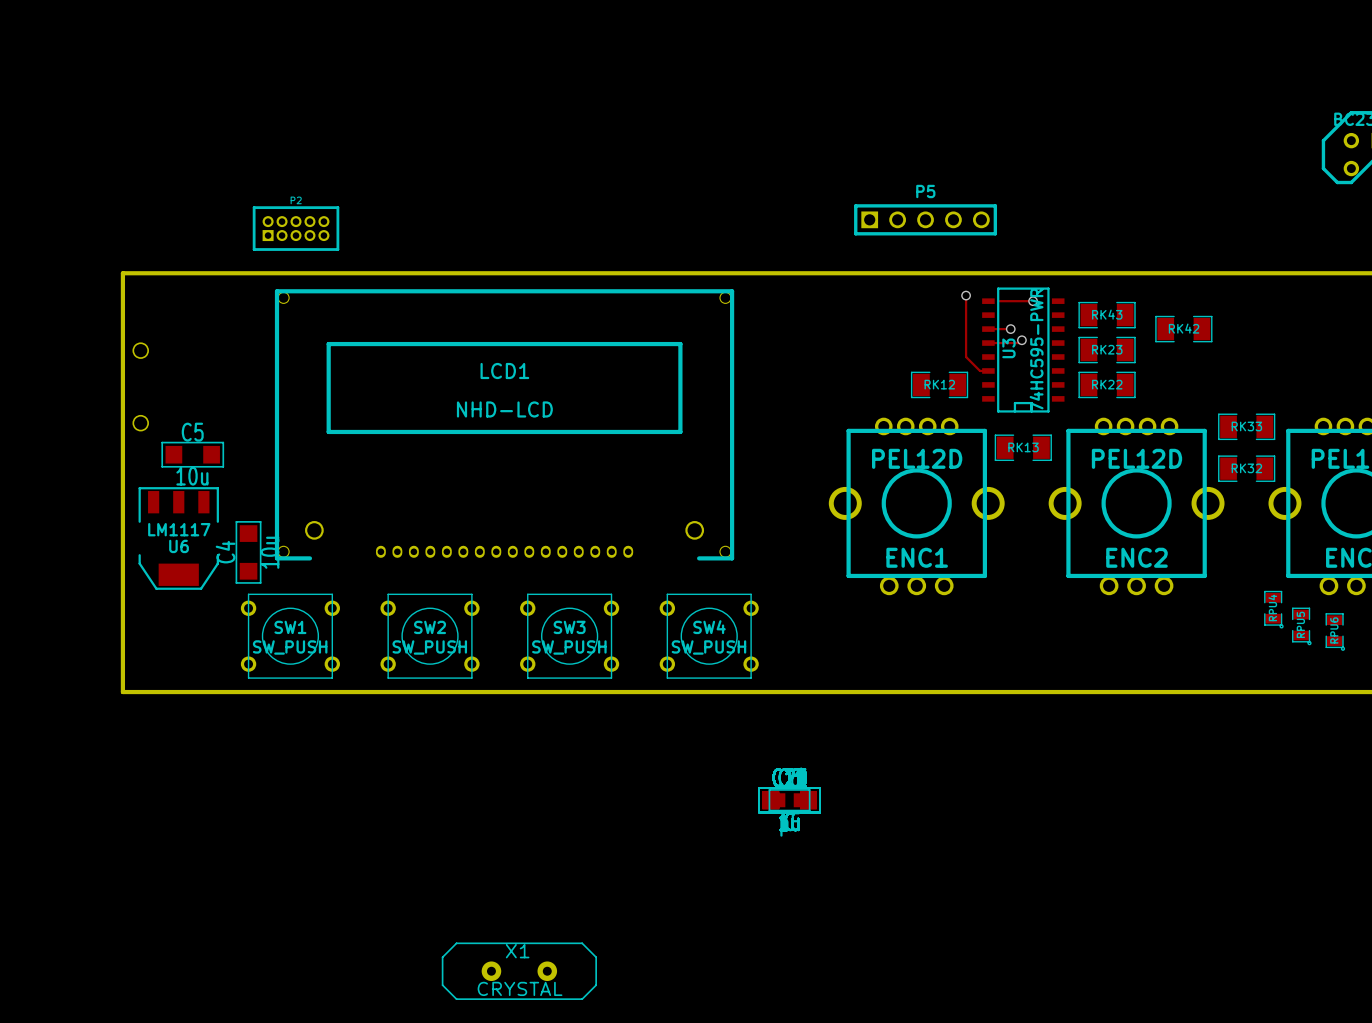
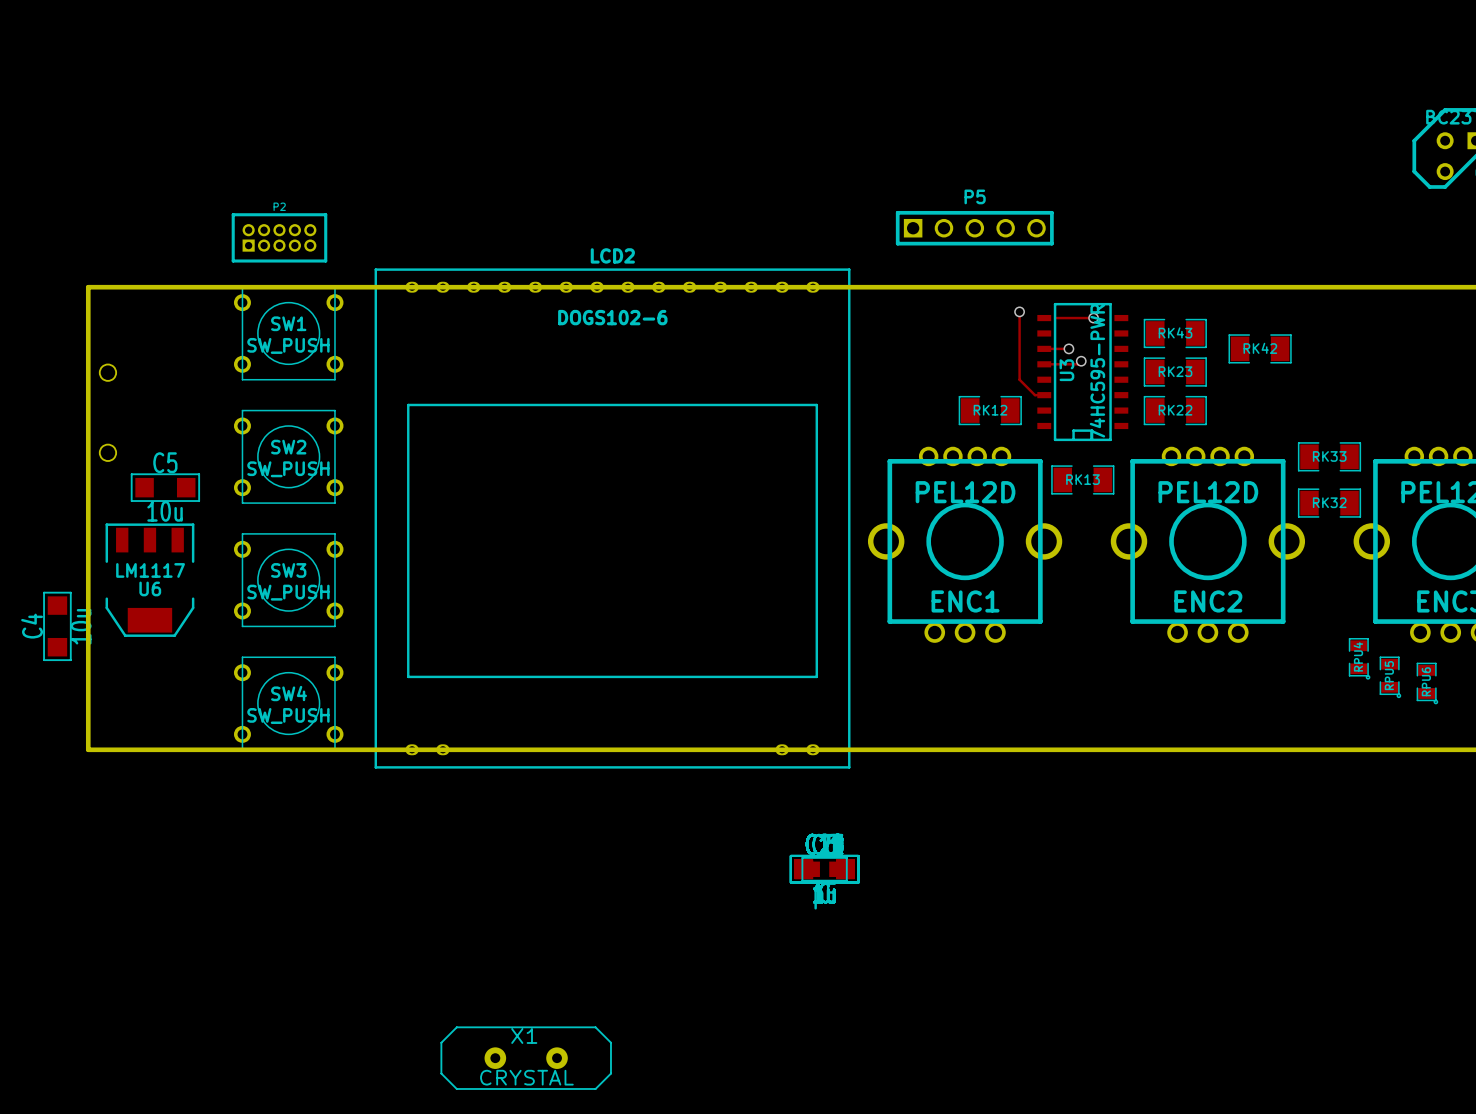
LCD1: NHD-LCD (504, 424) -> none
LCD2: none -> DOGS102-6 (612, 518)
C4 position: (248, 552) -> (57, 626)
SW1 position: (290, 636) -> (288, 333)
SW2 position: (430, 636) -> (288, 456)
SW3 position: (569, 636) -> (288, 580)
SW4 position: (709, 636) -> (288, 703)

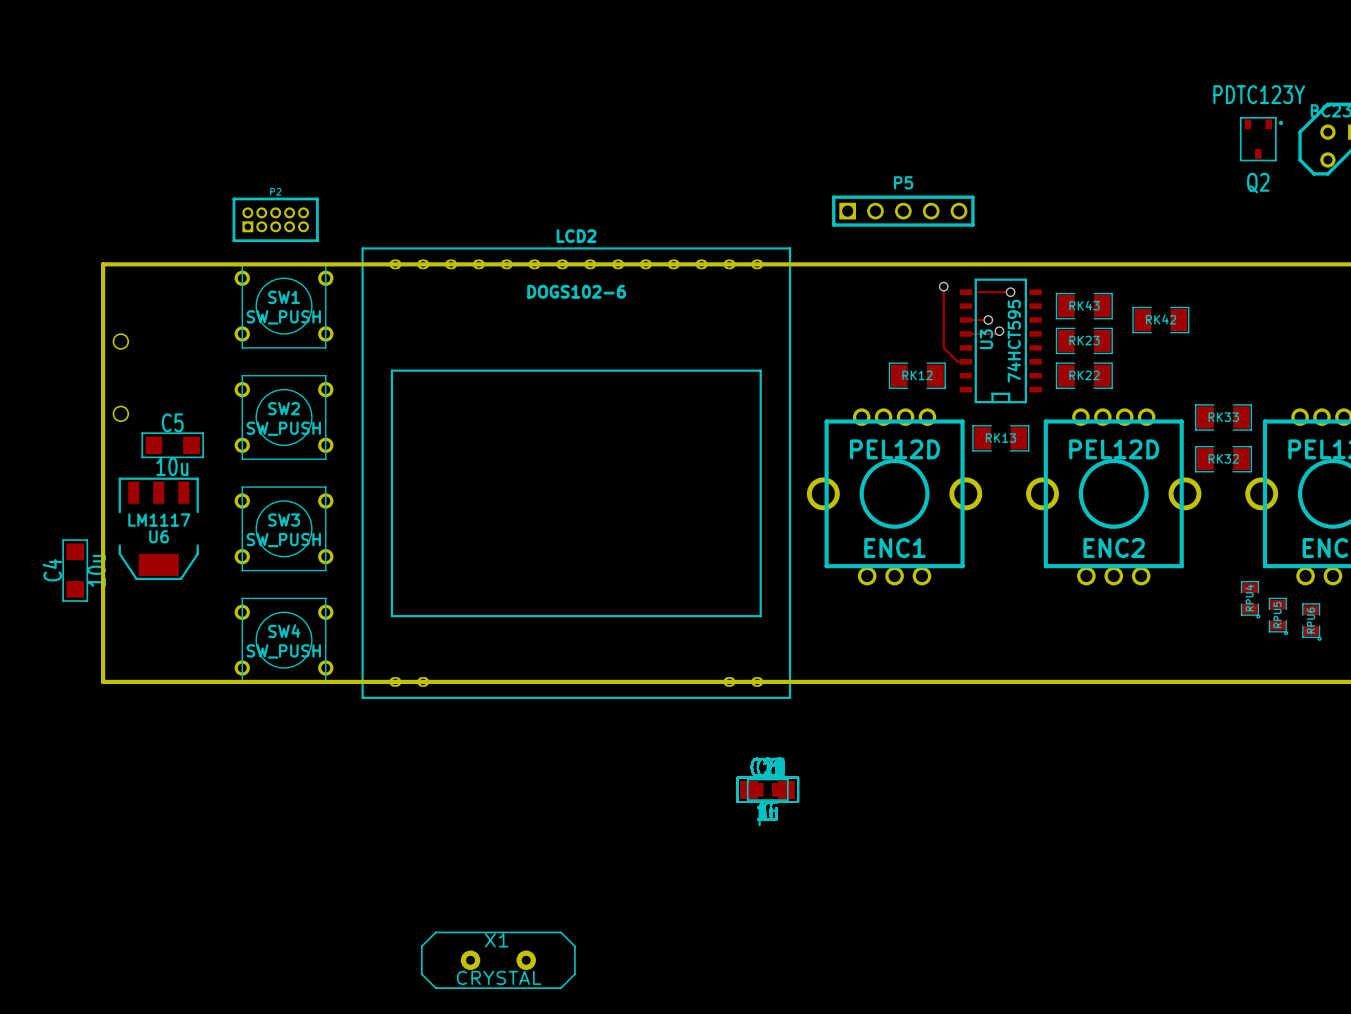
Q2: none -> PDTC123Y (1261, 139)
U3 value: 74HC595-PWR (1097, 372) -> 74HCT595 (1014, 341)

